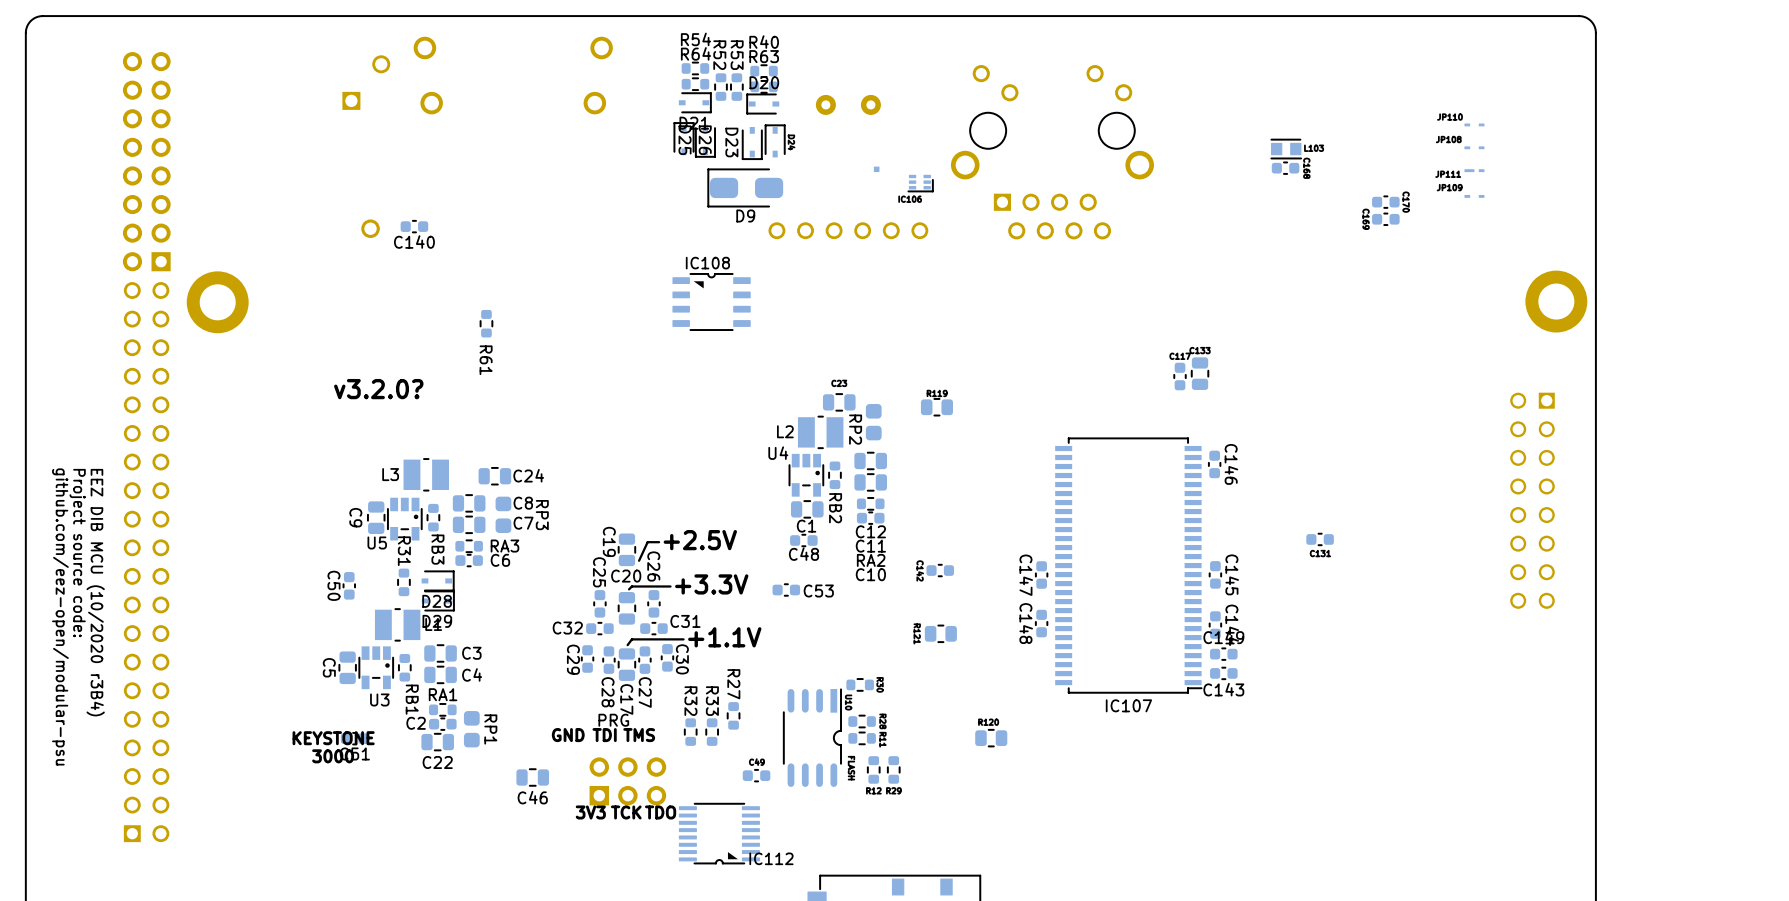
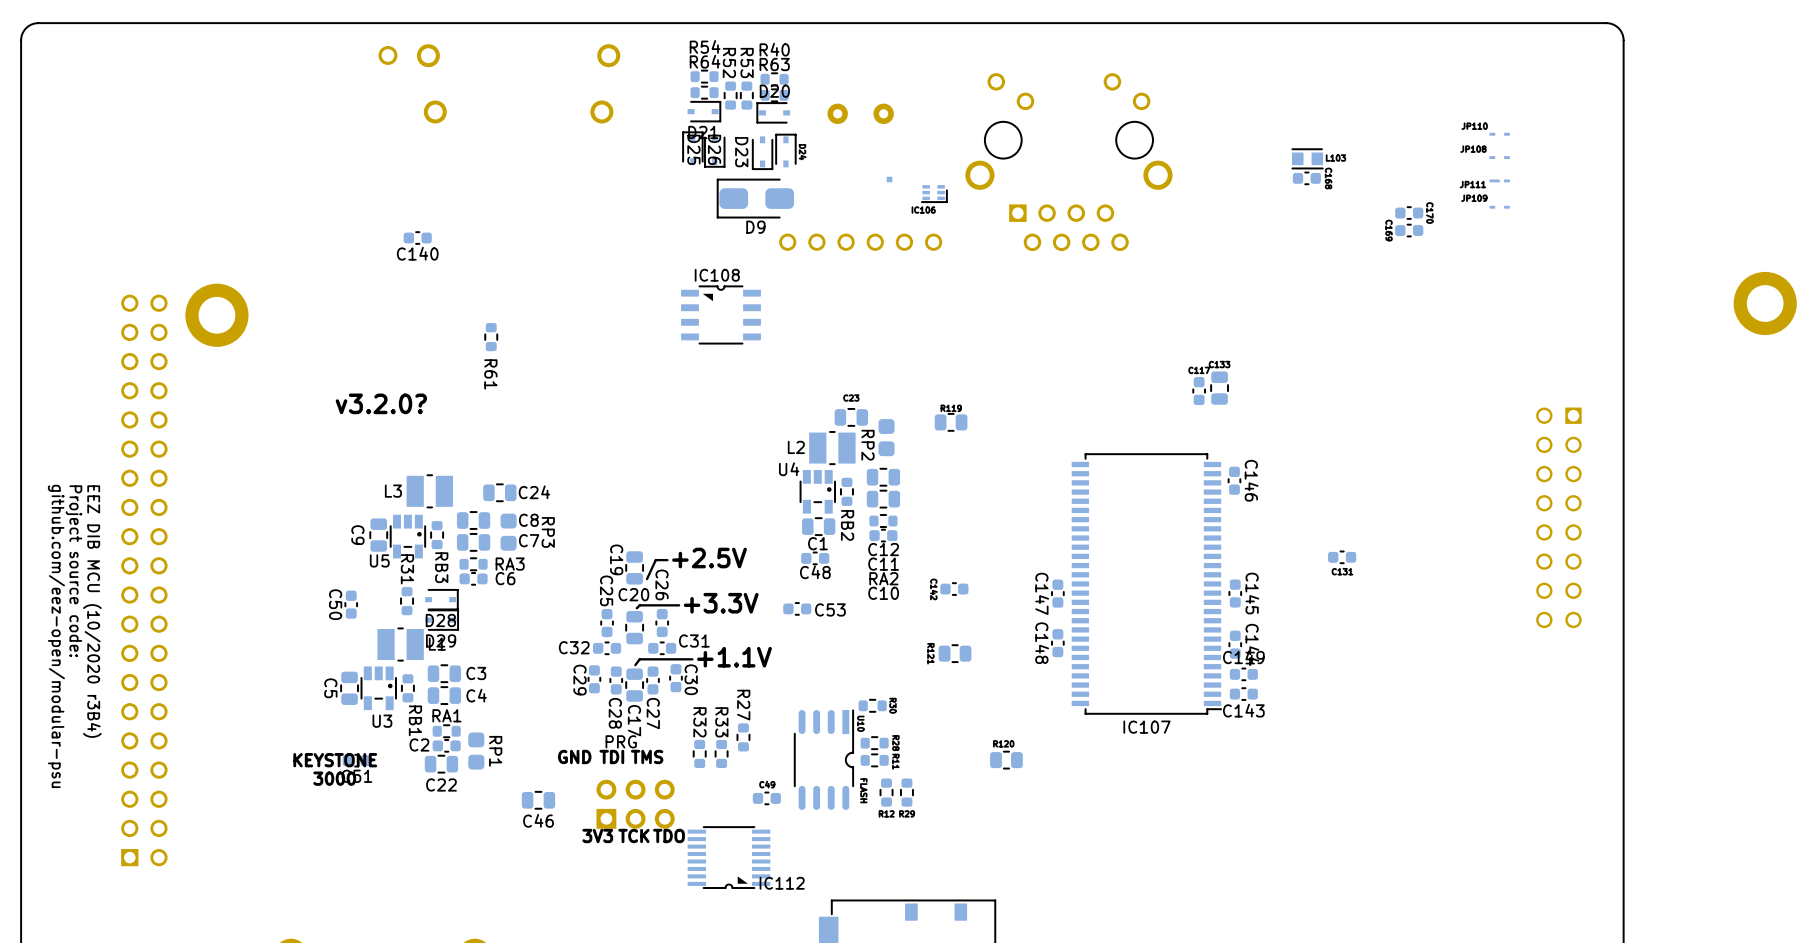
part: (366, 82) -> none
part: (146, 161) -> none
part position: (370, 228) -> (387, 55)
part position: (1556, 301) -> (1765, 303)

